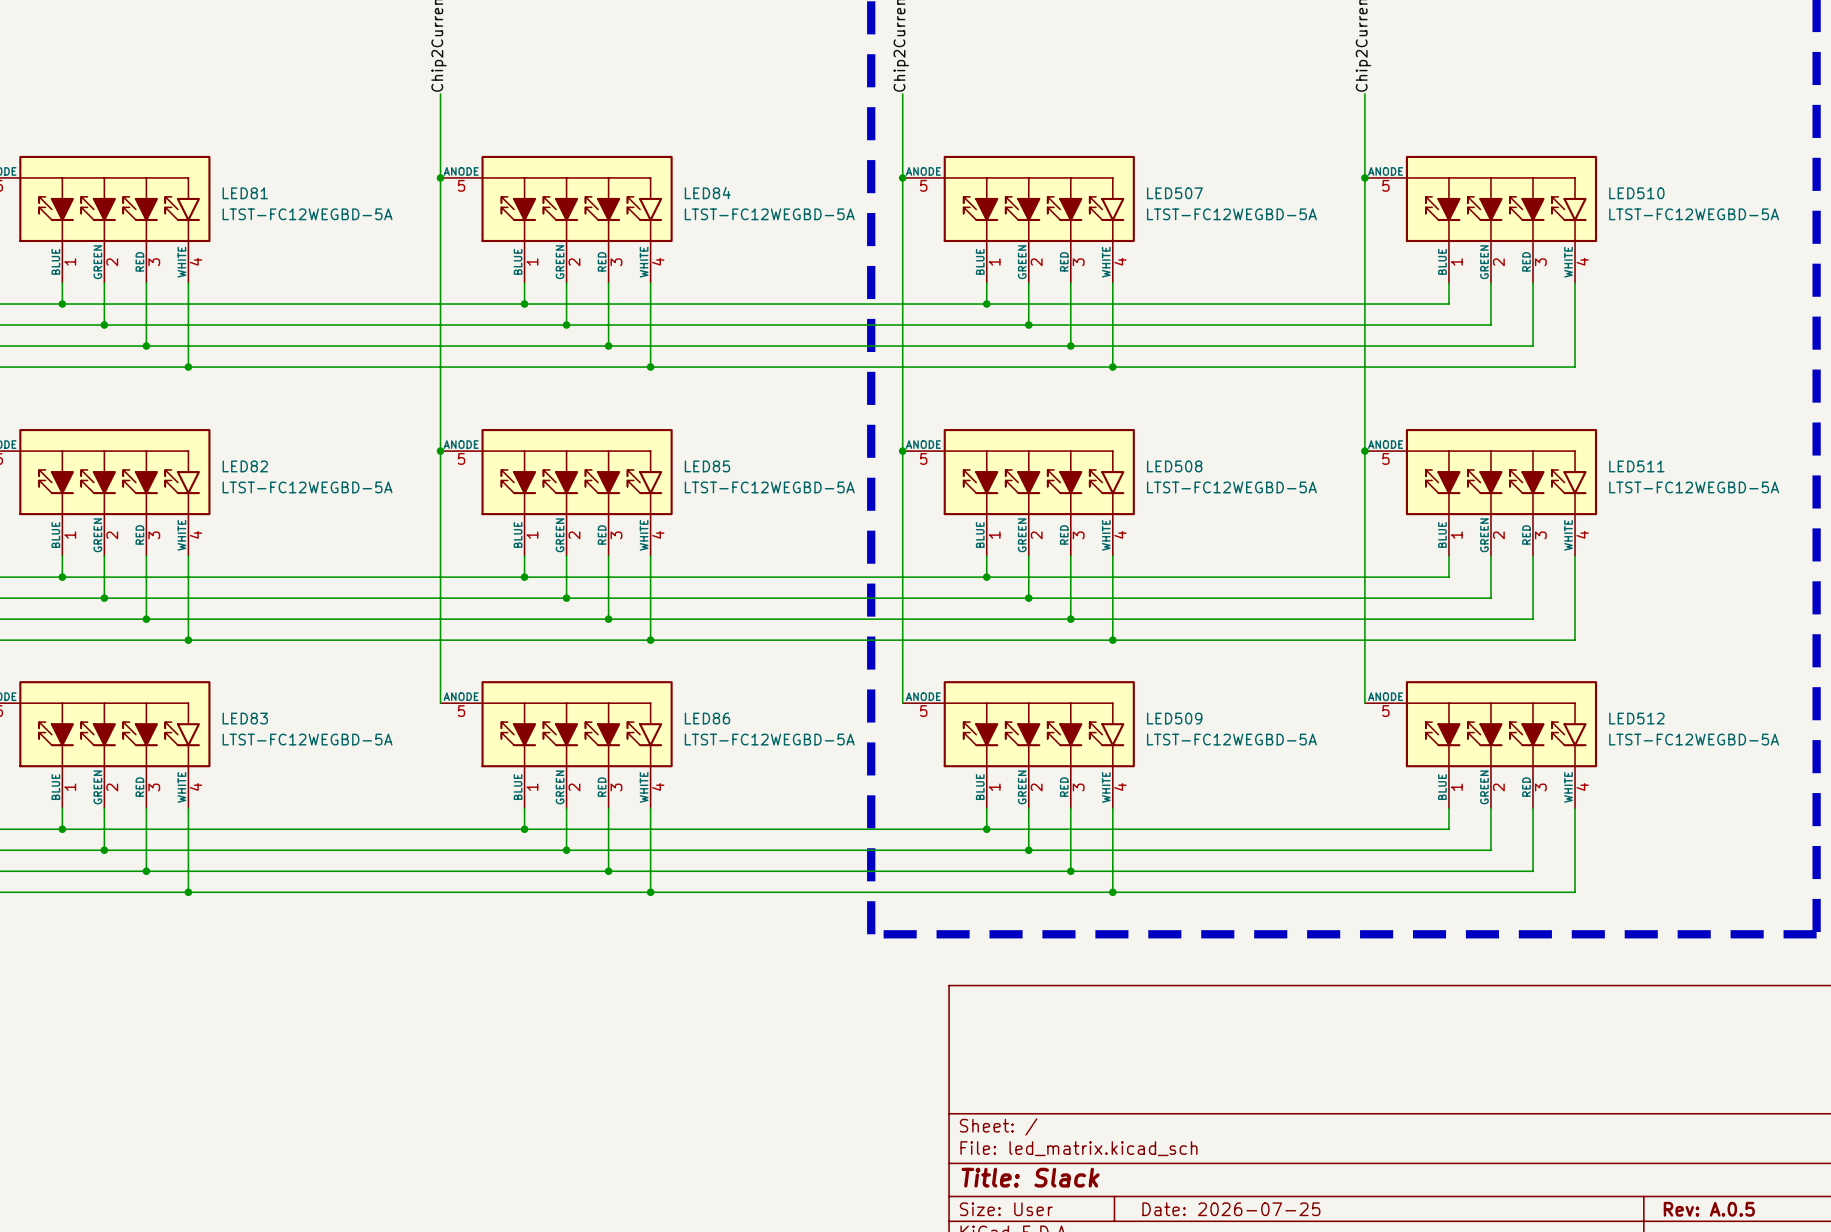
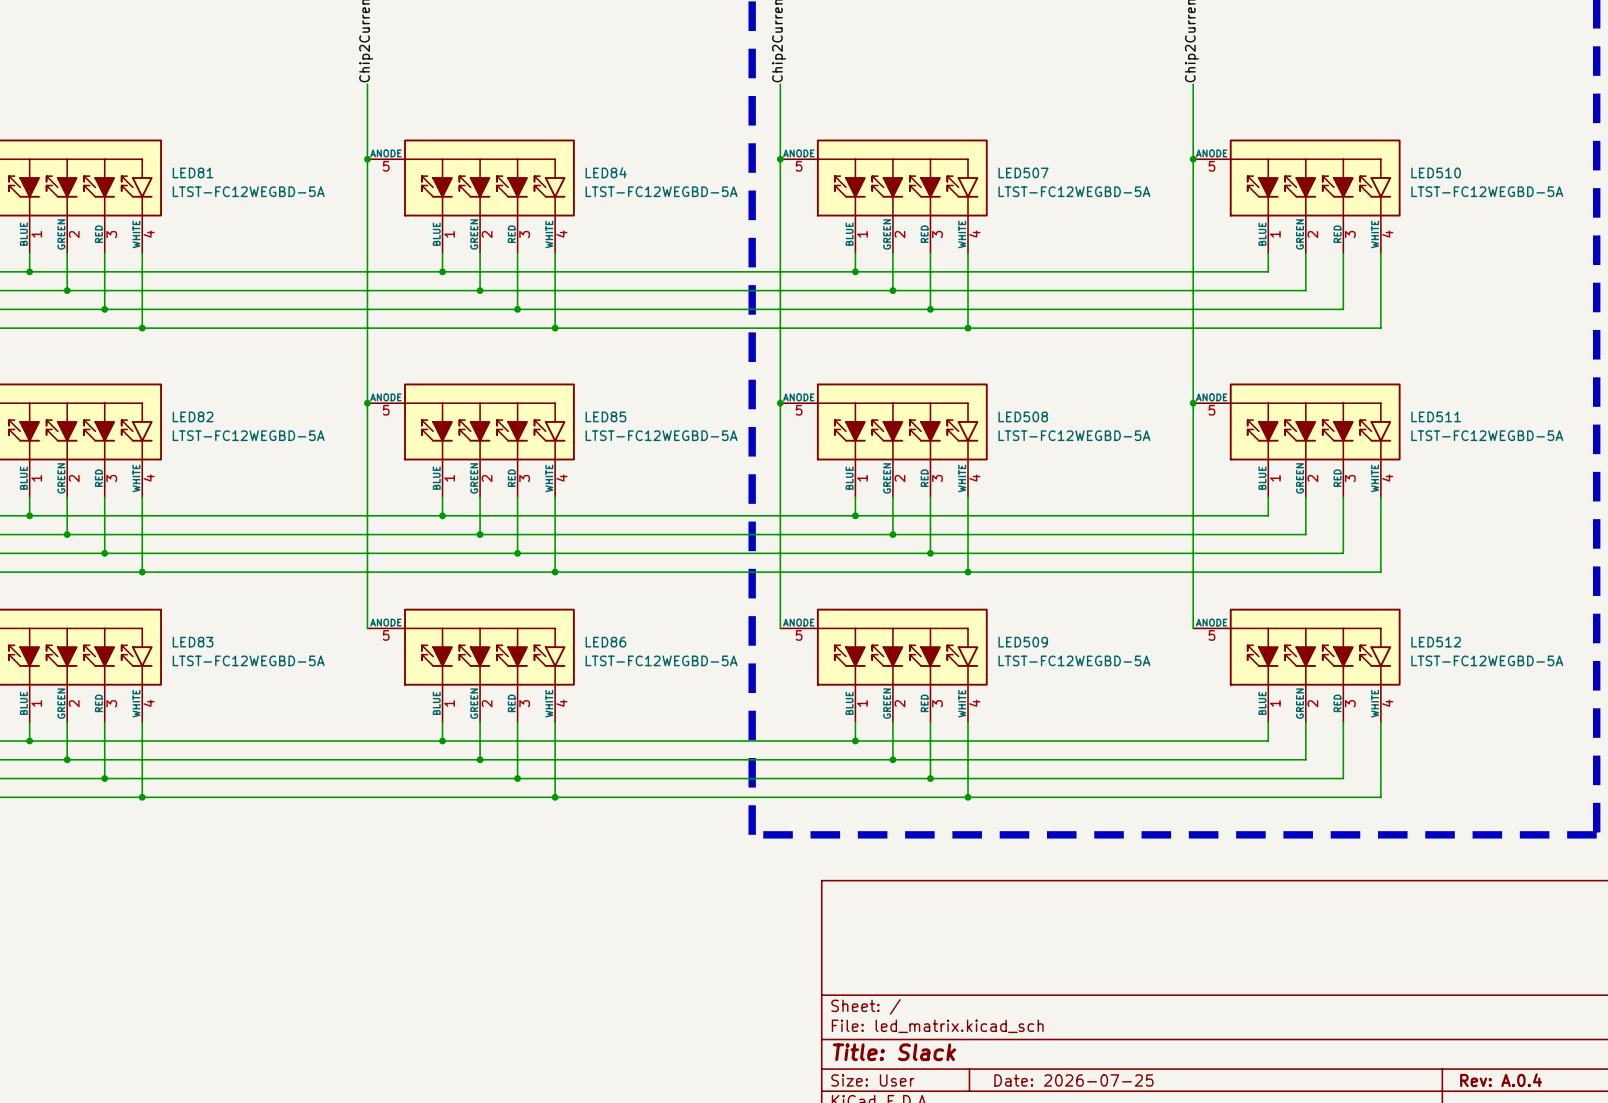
title block: Rev: A.0.5 (1709, 1209) -> Rev: A.0.4 (1501, 1080)

